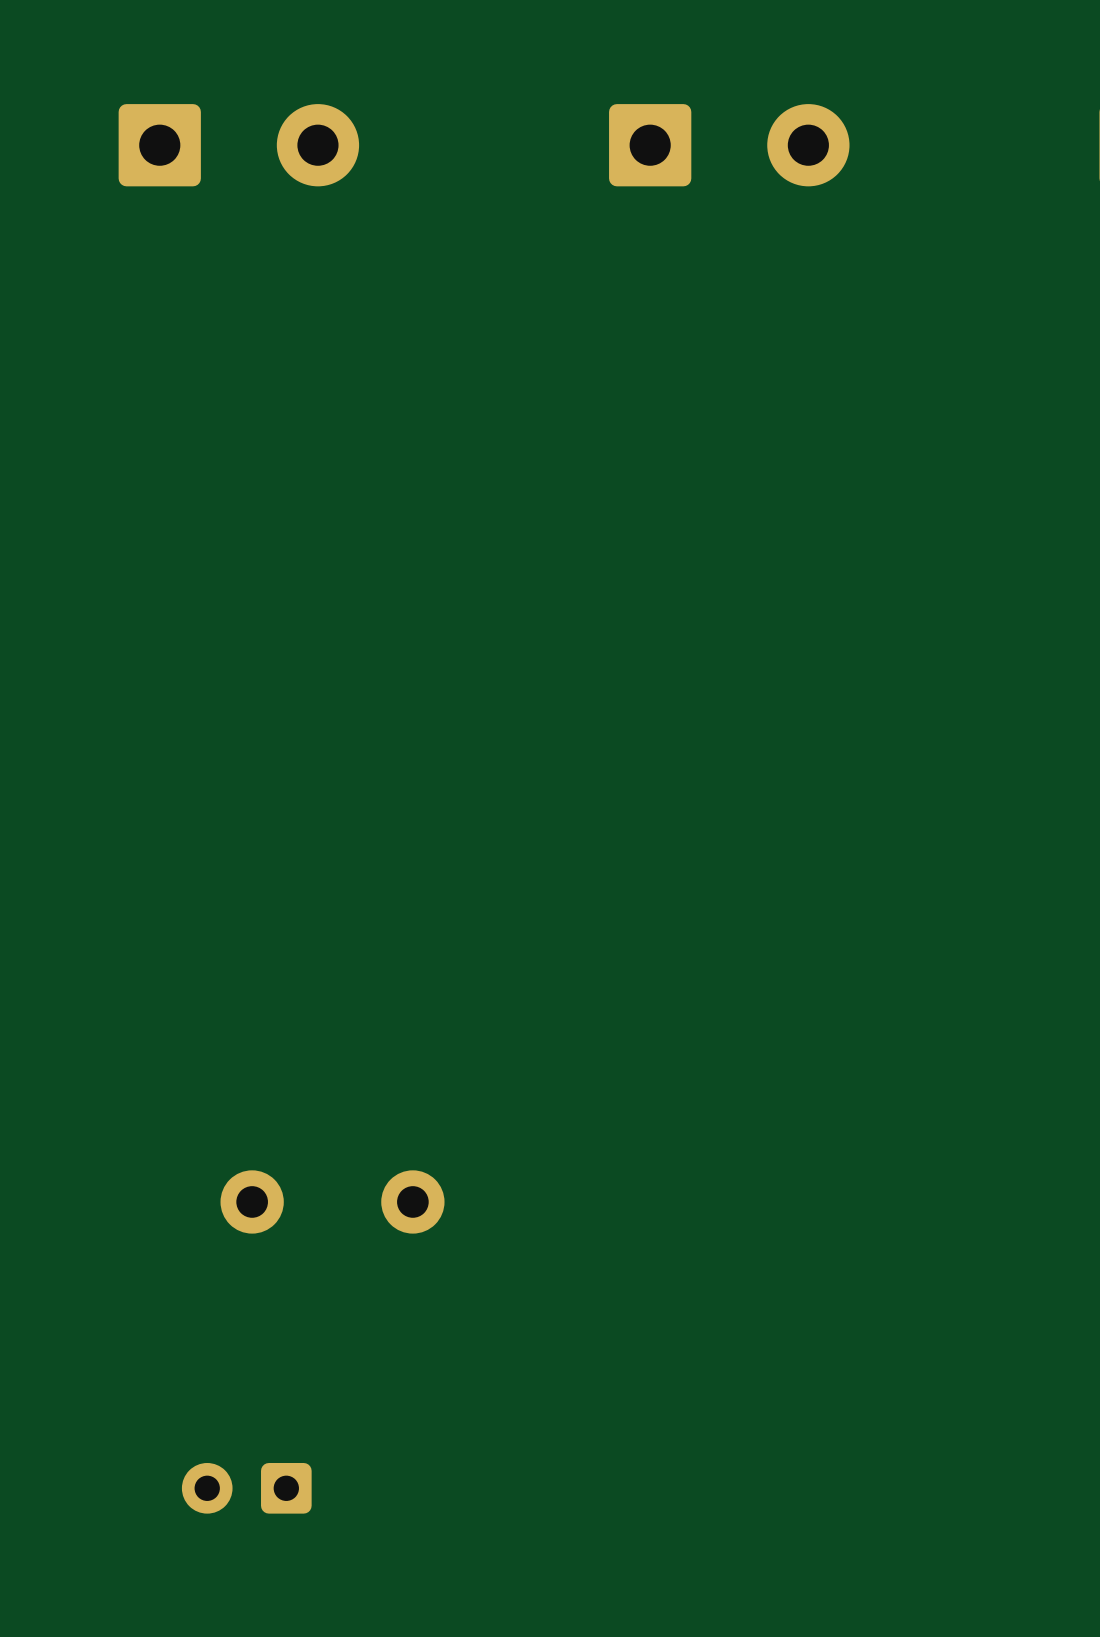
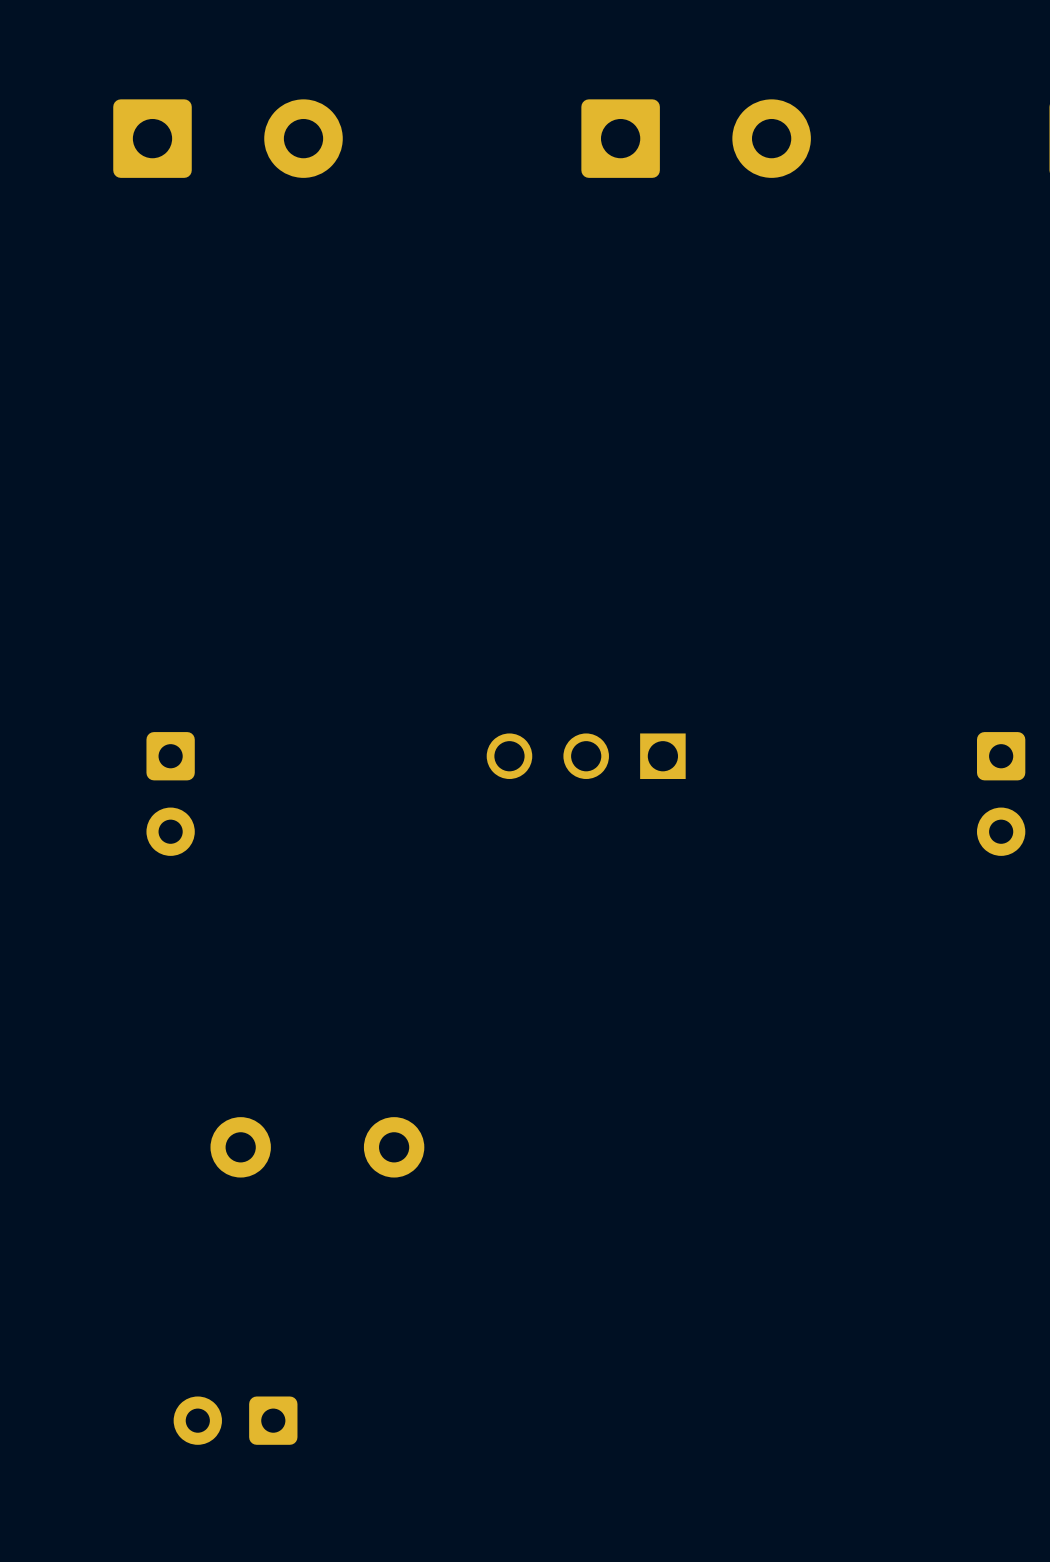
part: none -> (586, 756)
part: none -> (170, 793)
part: none -> (1001, 793)

